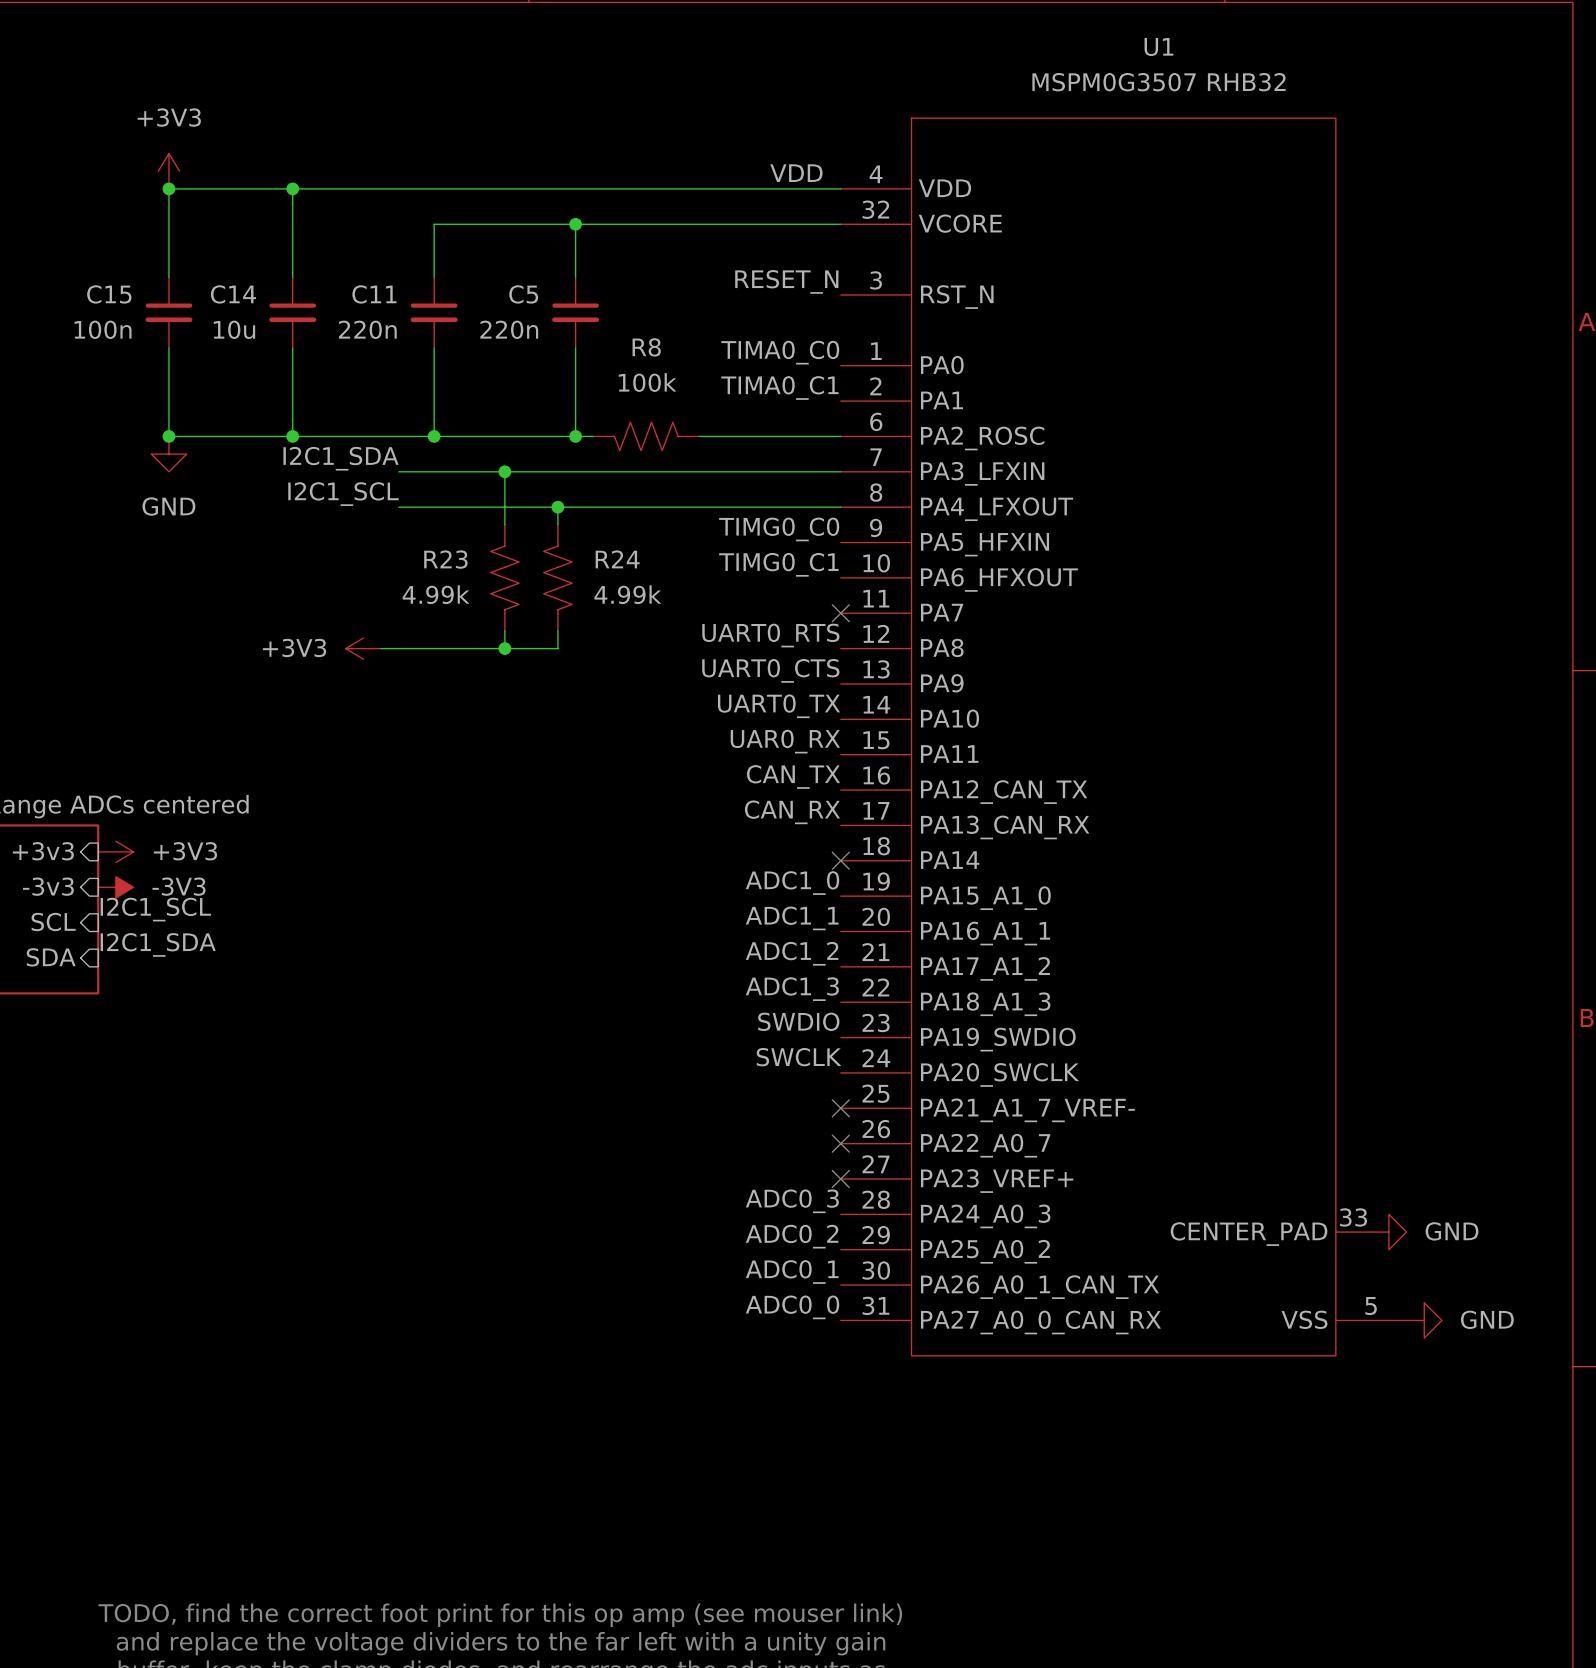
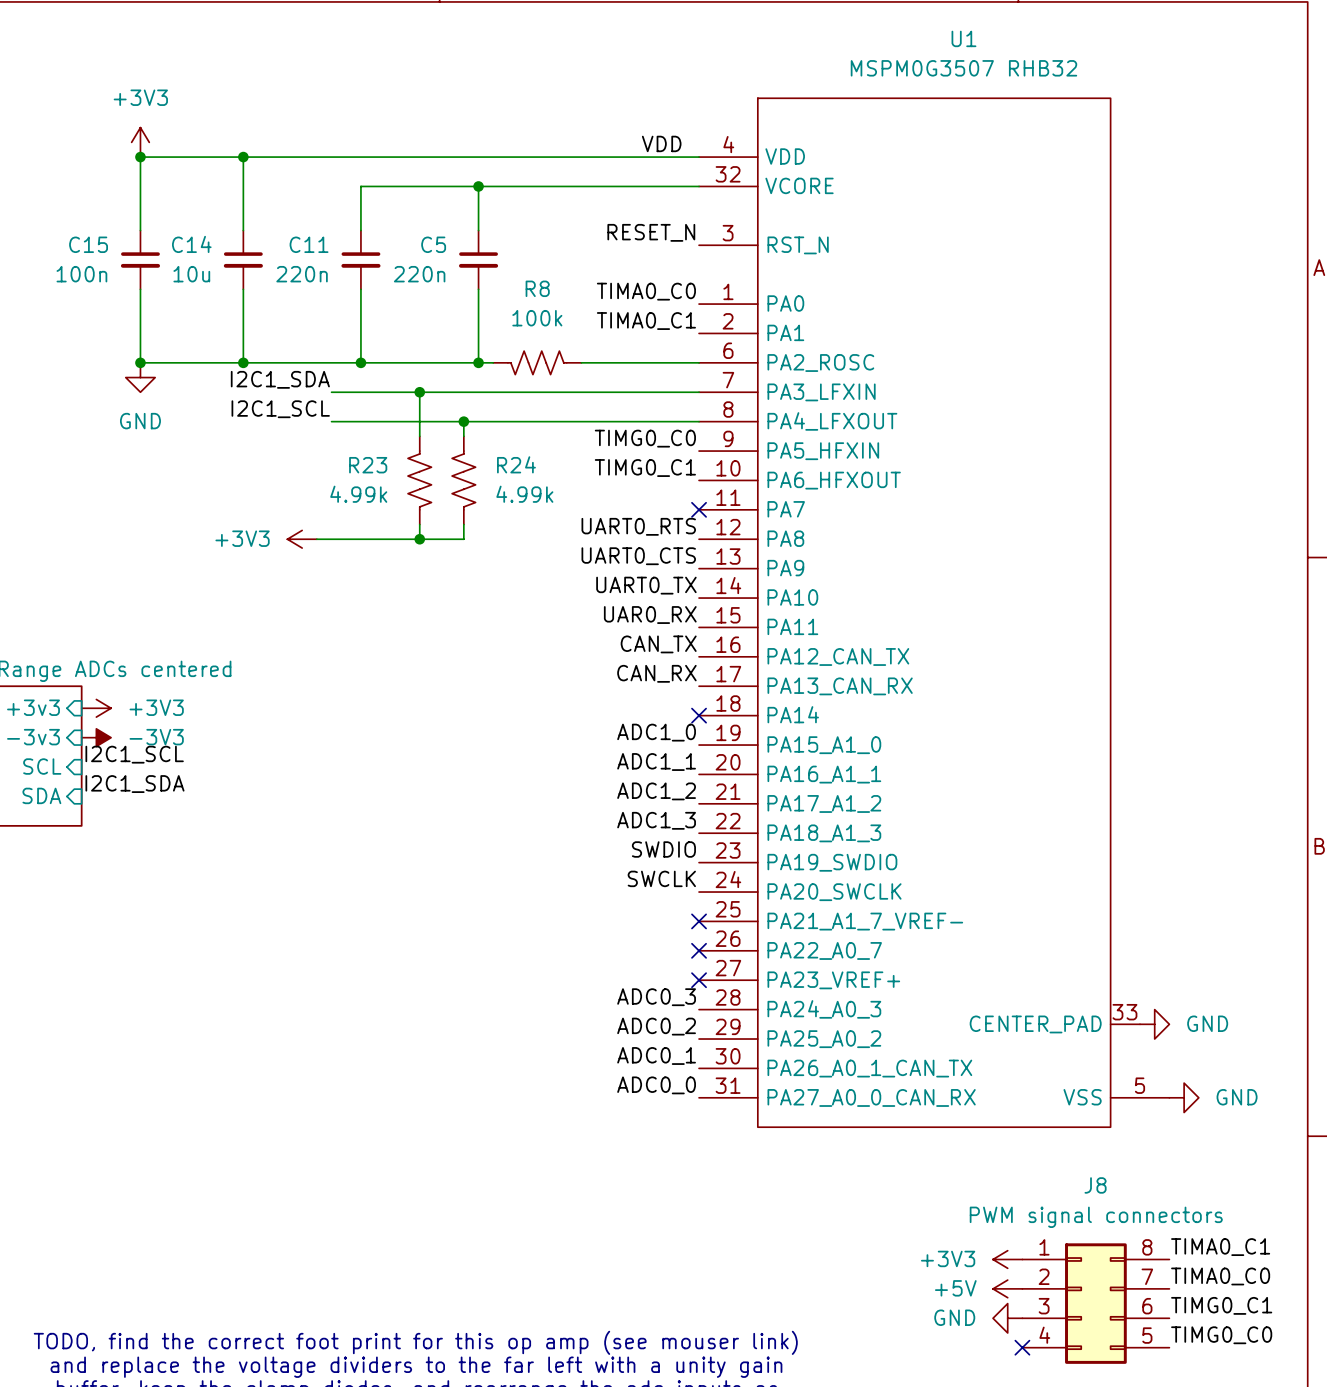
label: none -> TIMA0_C1 (1220, 1247)
power symbol: none -> +3V3 (1007, 1259)
label: none -> TIMA0_C0 (1220, 1276)
power symbol: none -> +5V (1007, 1288)
J8: none -> PWM signal connectors (1095, 1303)
label: none -> TIMG0_C1 (1221, 1305)
power symbol: none -> GND (1007, 1318)
label: none -> TIMG0_C0 (1221, 1335)
no-connect mark: none -> (1022, 1347)

